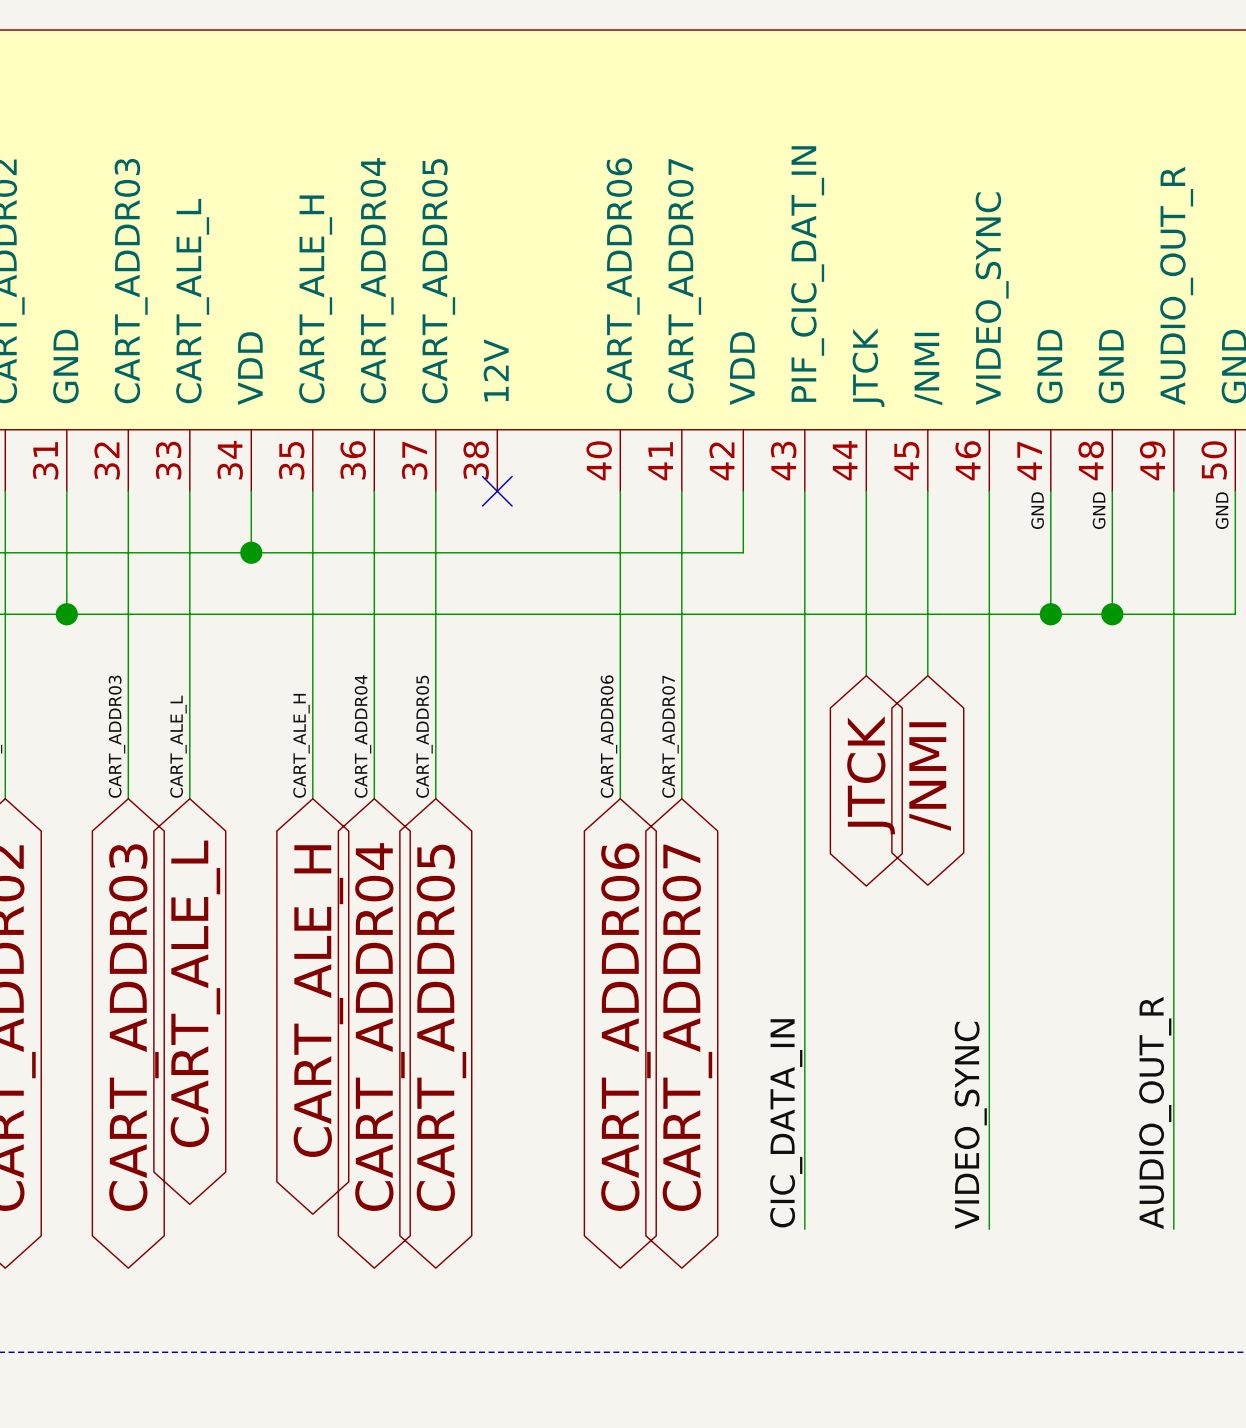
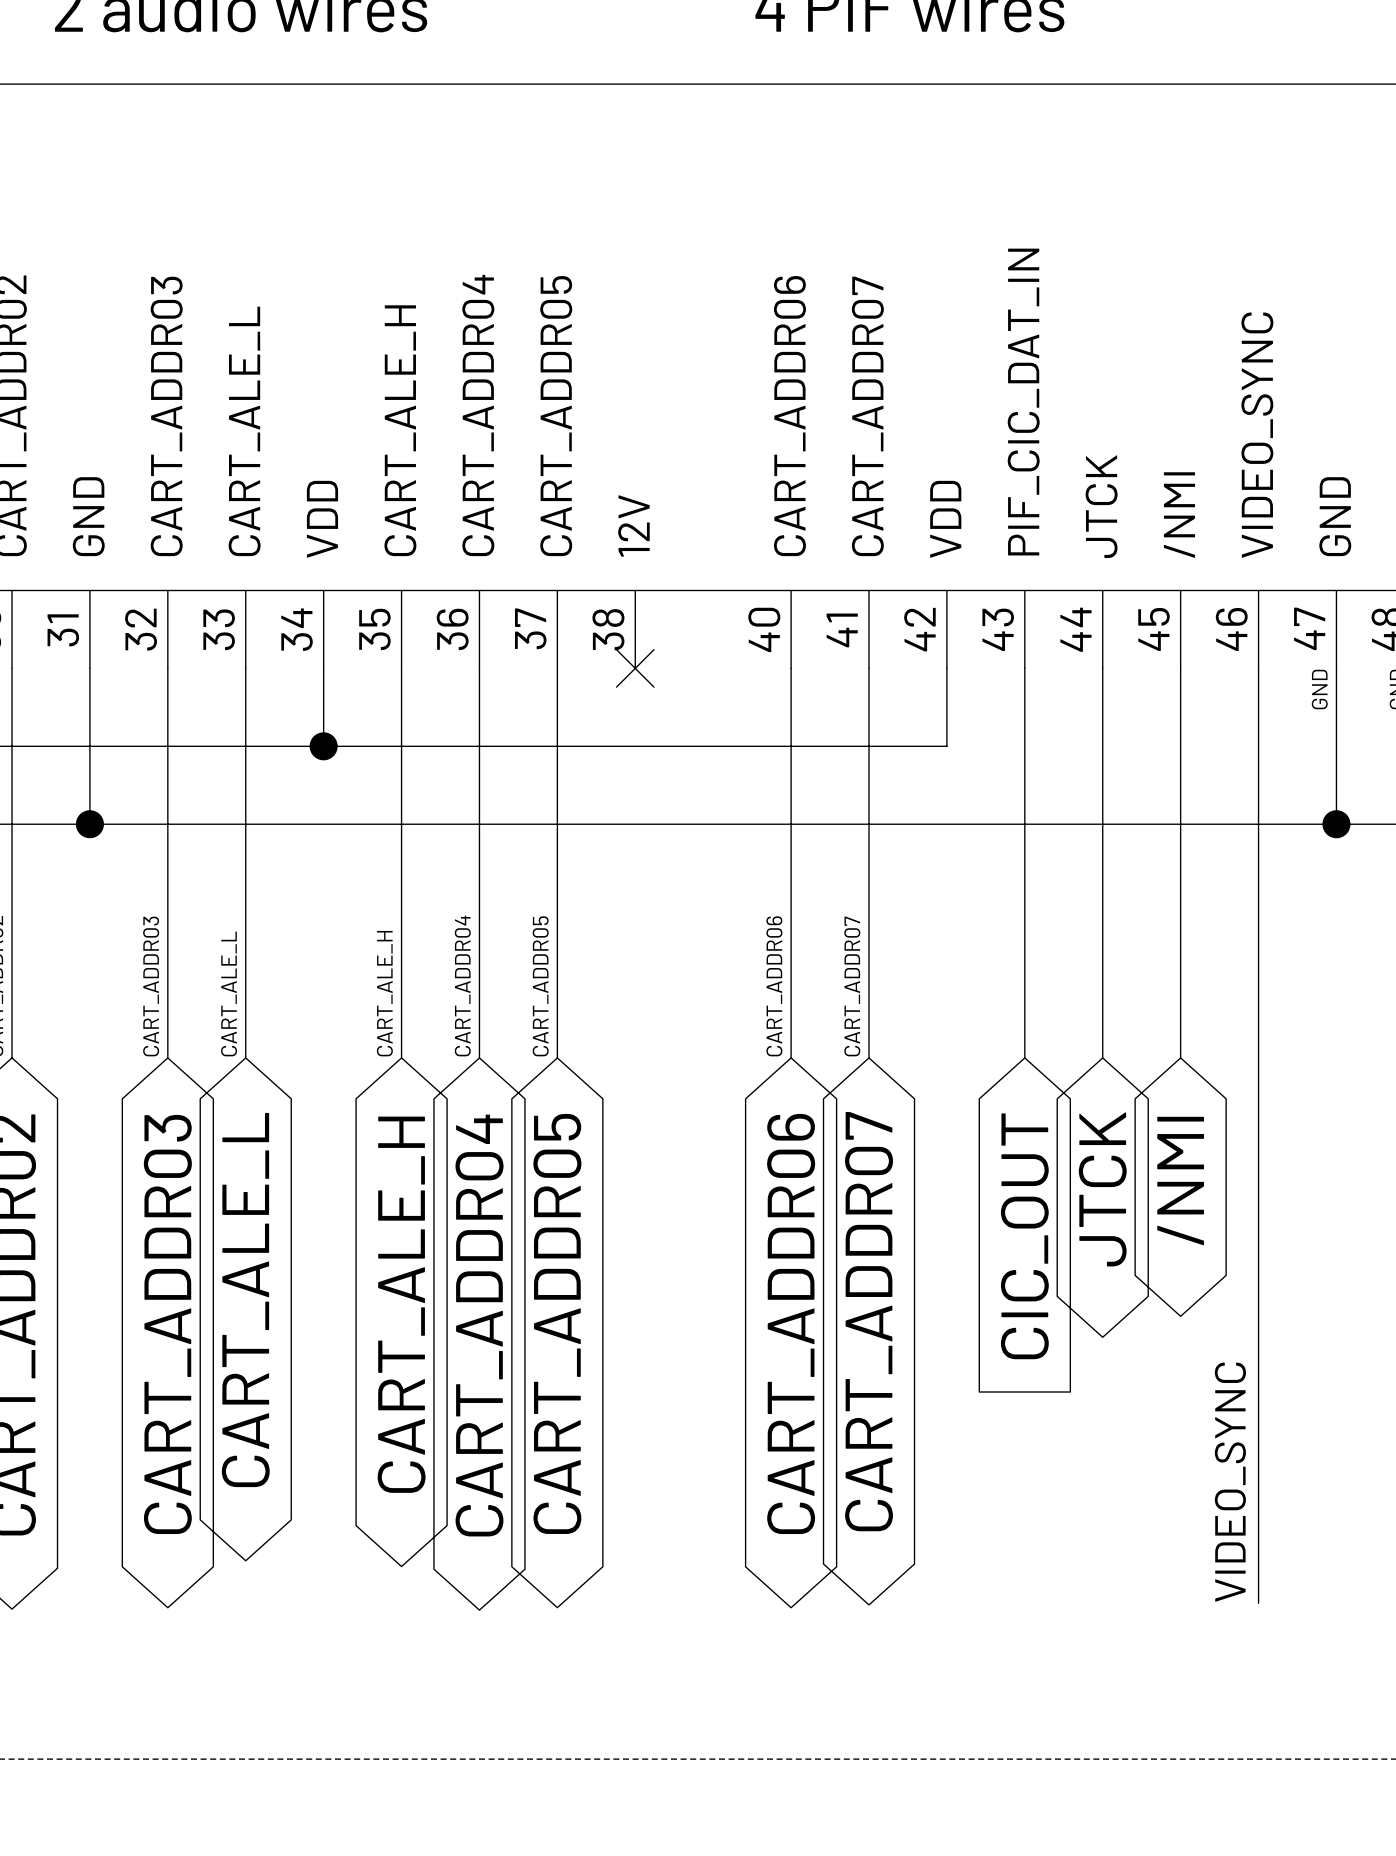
wire: none -> (1102, 902) (1102, 1057)
wire: none -> (1180, 902) (1180, 1057)
global label position: JTCK (871, 775) -> JTCK (1102, 1189)
global label position: /NMI (930, 776) -> /NMI (1180, 1181)
wire: (804, 798) (804, 1229) -> none
global label: none -> CIC_OUT (1024, 1236)
label: CIC_DATA_IN (786, 1123) -> none

